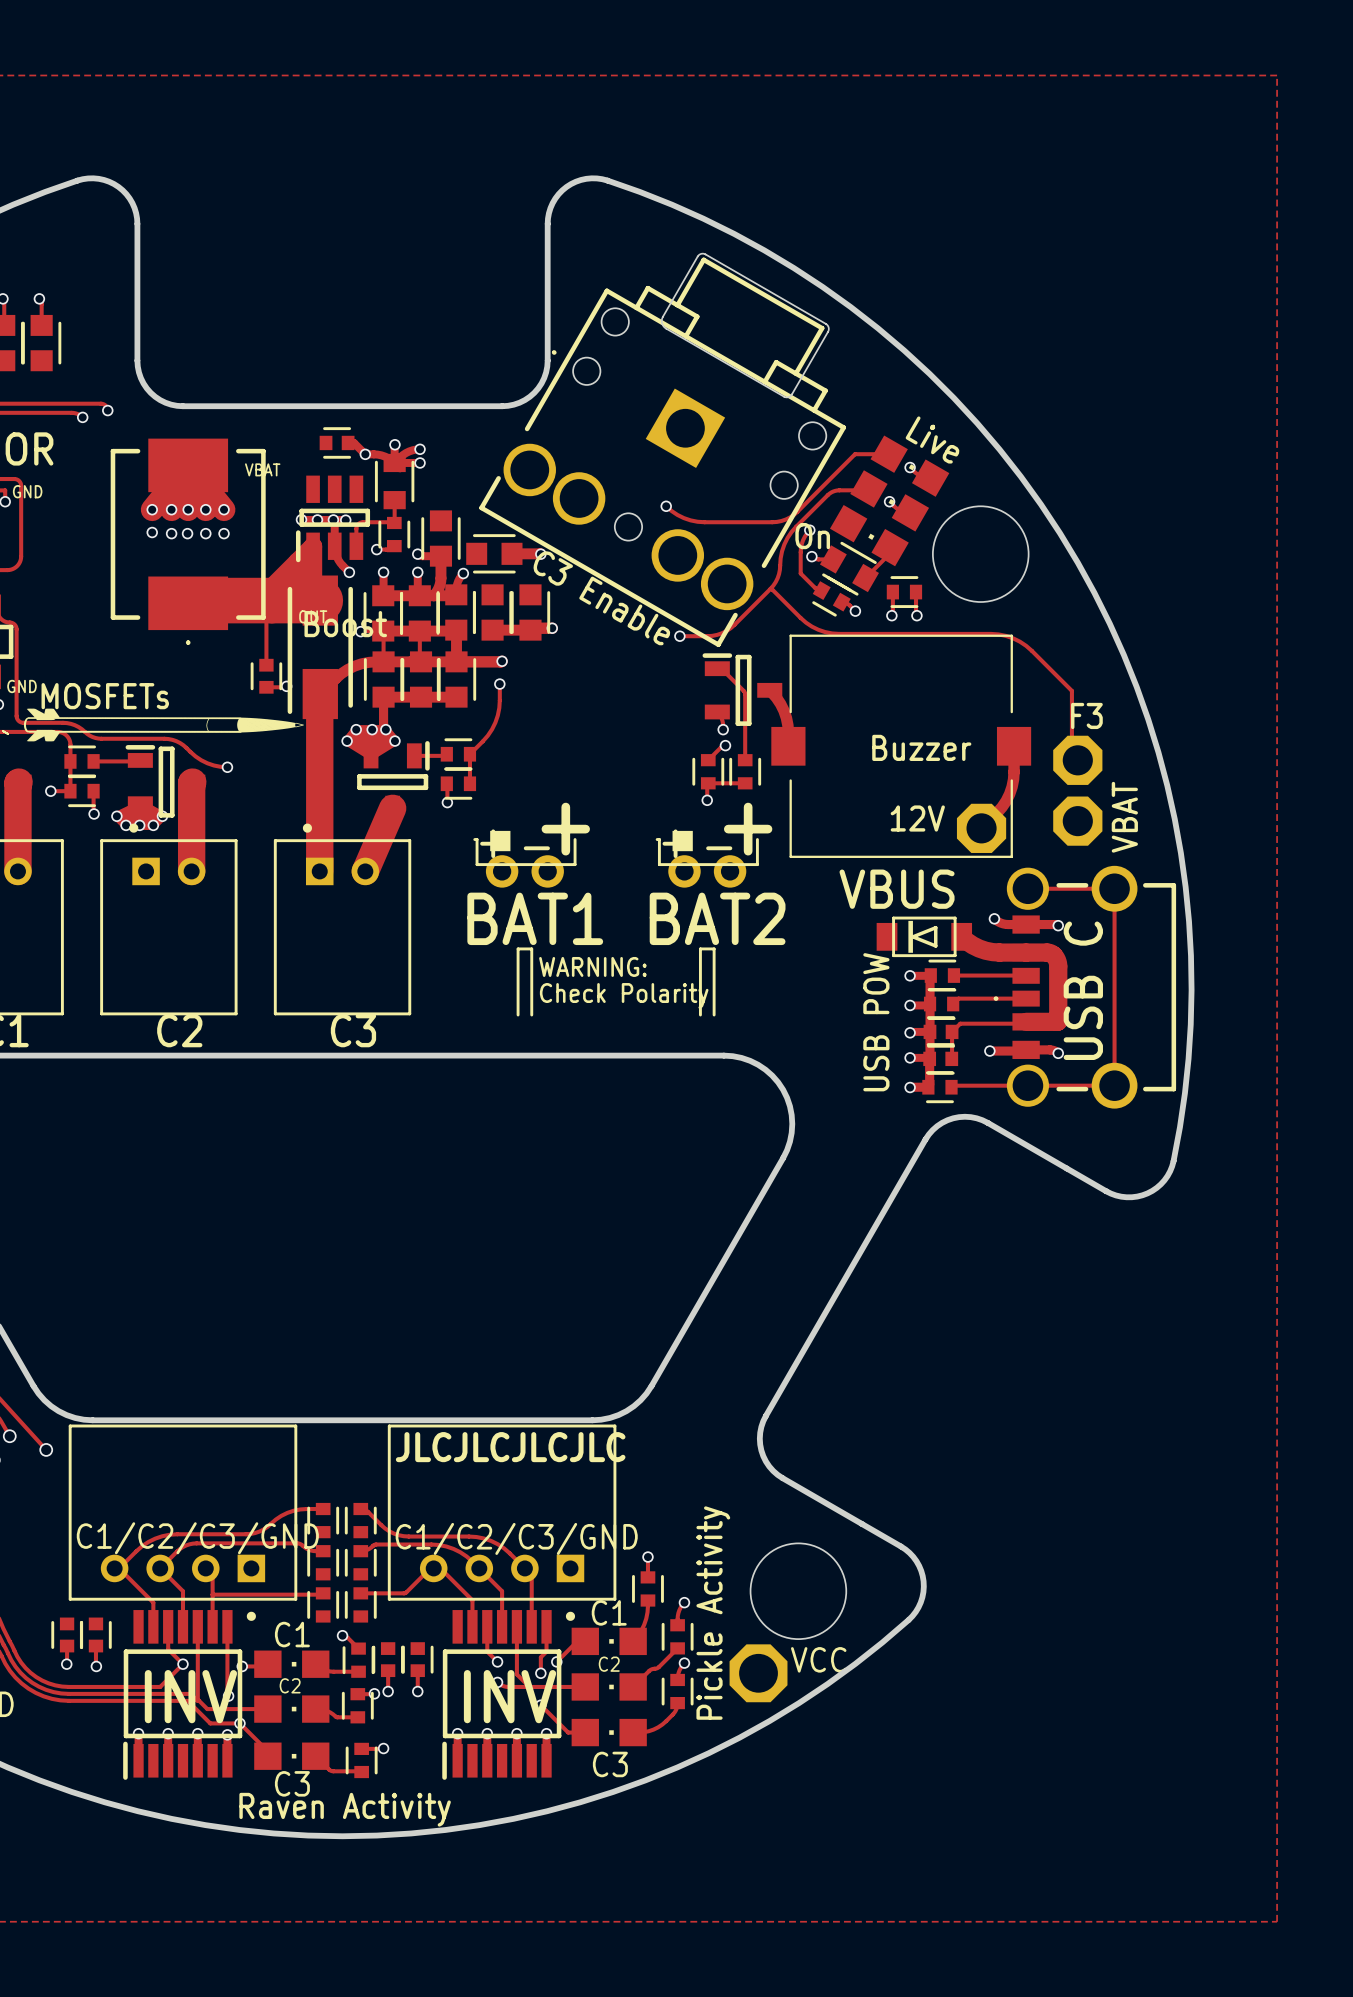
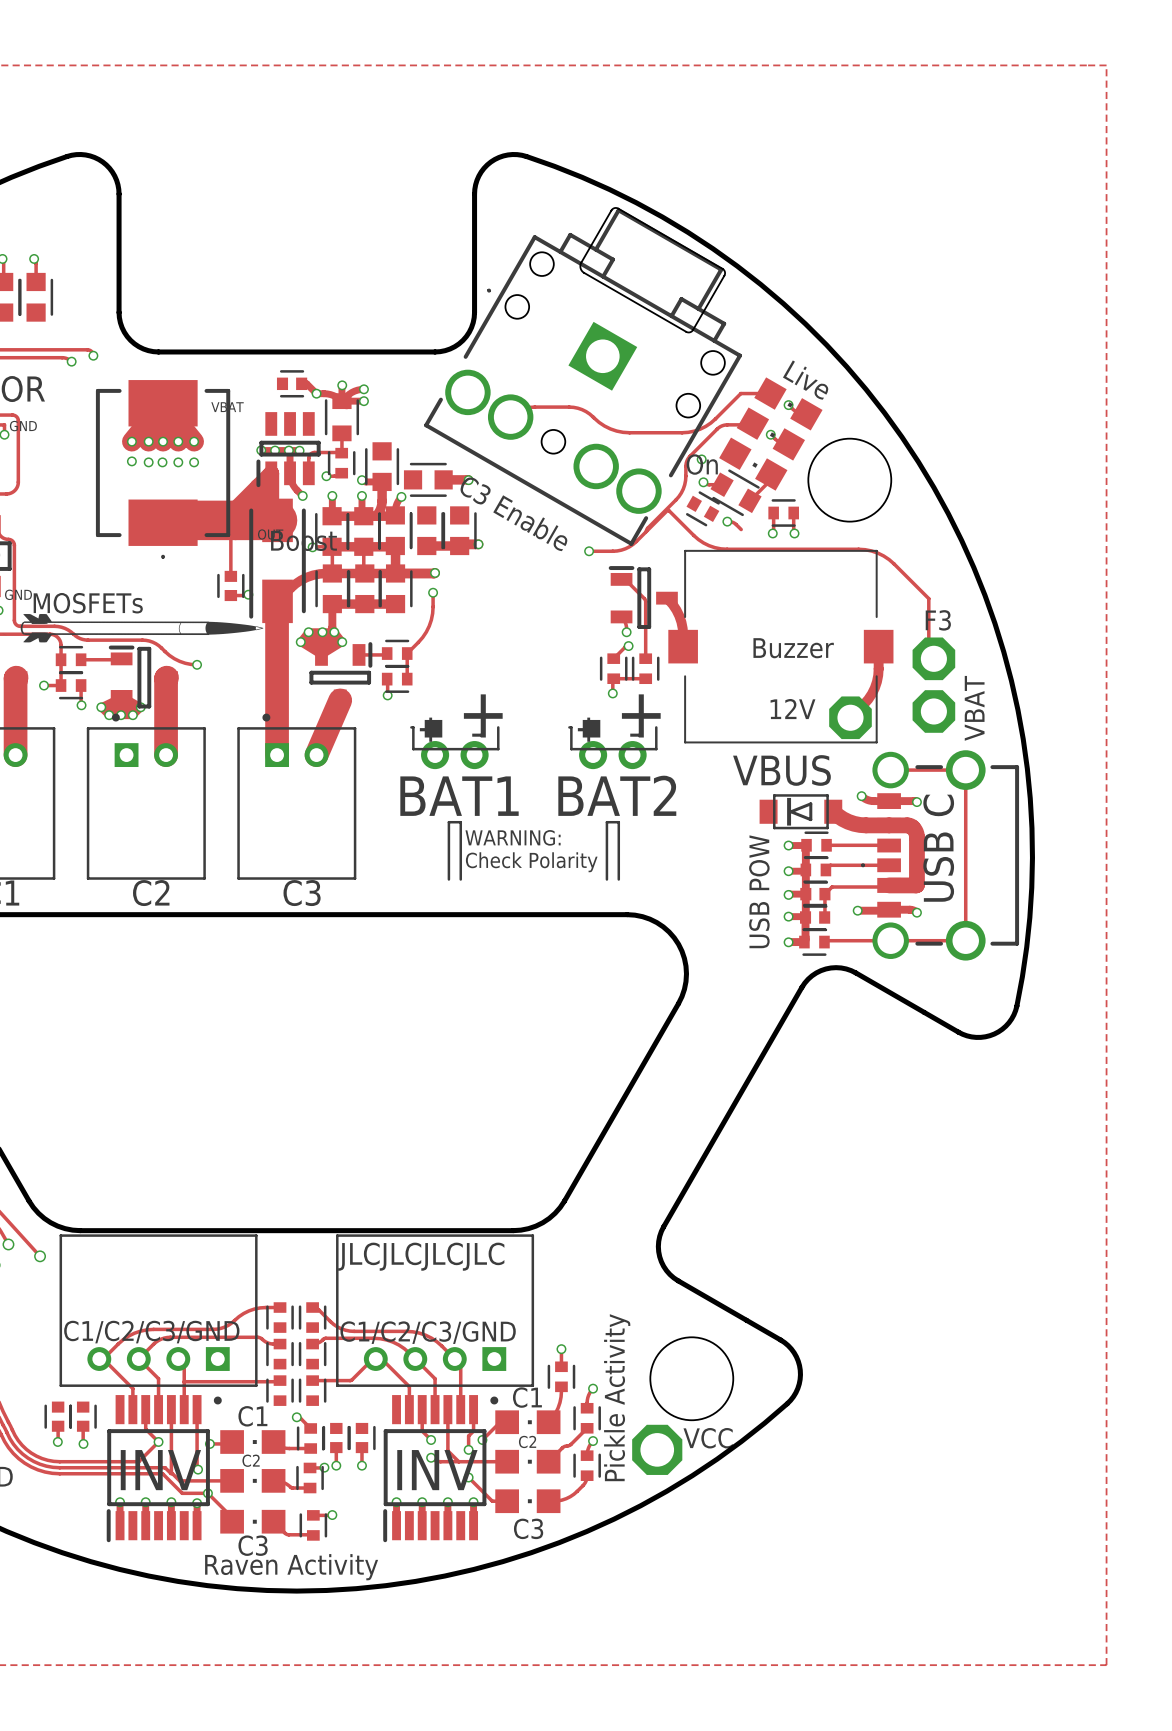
board edge: (697, 256) (701, 253) (705, 254) (825, 323) (828, 327) (828, 331) -> (604, 222) (612, 209) (618, 208) (723, 269) (724, 274) (717, 287)
board edge: (670, 303) (661, 319) (666, 328) (784, 396) (790, 395) (799, 380) -> (581, 262) (580, 268) (584, 272) (686, 331) (693, 329)
part position: (662, 452) -> (583, 377)
track: (825, 483) (793, 514) (776, 521) (697, 521) (677, 514) (666, 506) -> (715, 418) (700, 429) (688, 432) (629, 432) (610, 428) (586, 411) (573, 407) (530, 407) (521, 409) (510, 417)
via: (666, 506) -> none
track: (796, 526) (784, 544) (779, 574) (770, 588) -> (690, 456) (686, 462) (685, 480) (681, 492) (646, 531)
track: (809, 530) (801, 544) (800, 573) (815, 588) (821, 590) -> none
part position: (831, 596) -> (702, 508)
via position: (855, 611) -> (727, 521)

